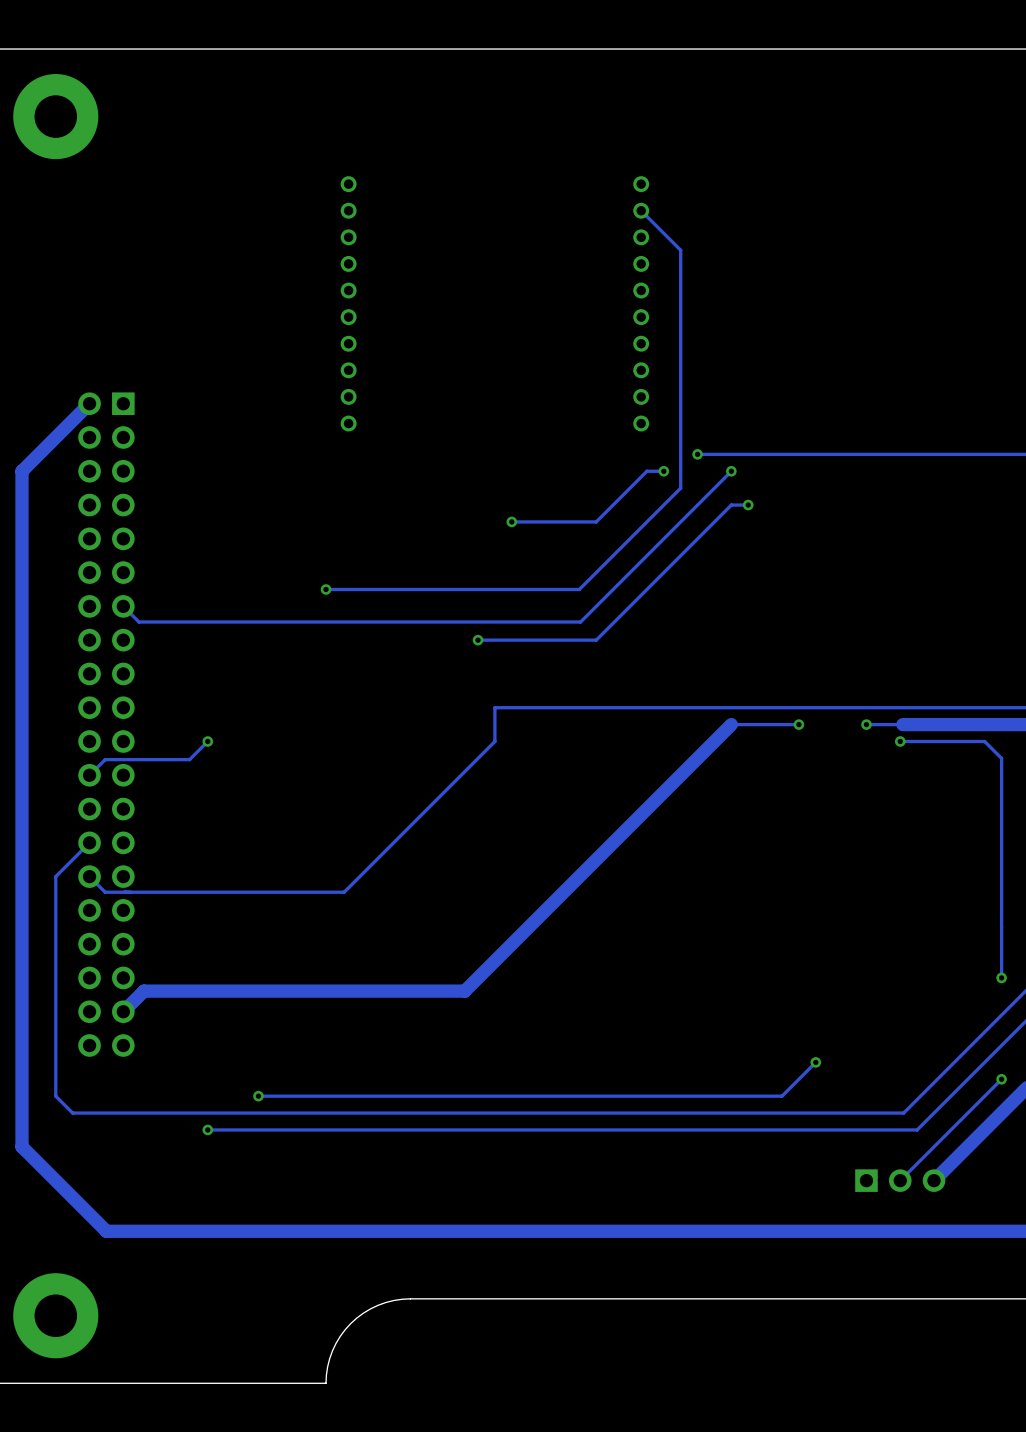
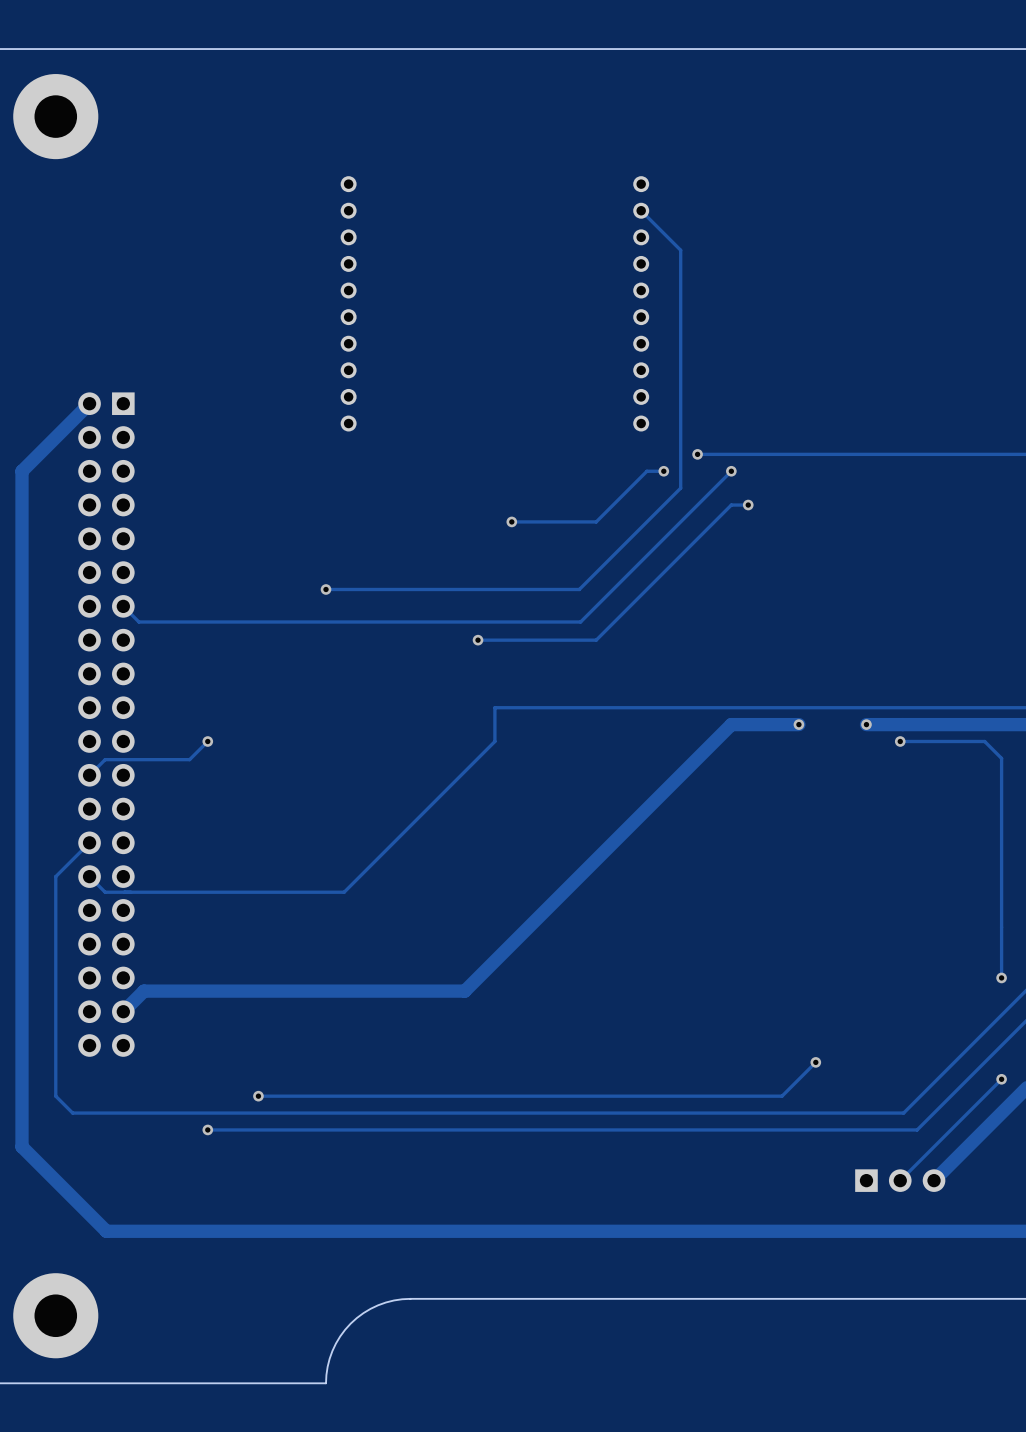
track width: thin (798, 724) (731, 724) -> thick (798, 724) (731, 724)
track width: thin (902, 724) (866, 724) -> thick (902, 724) (866, 724)

